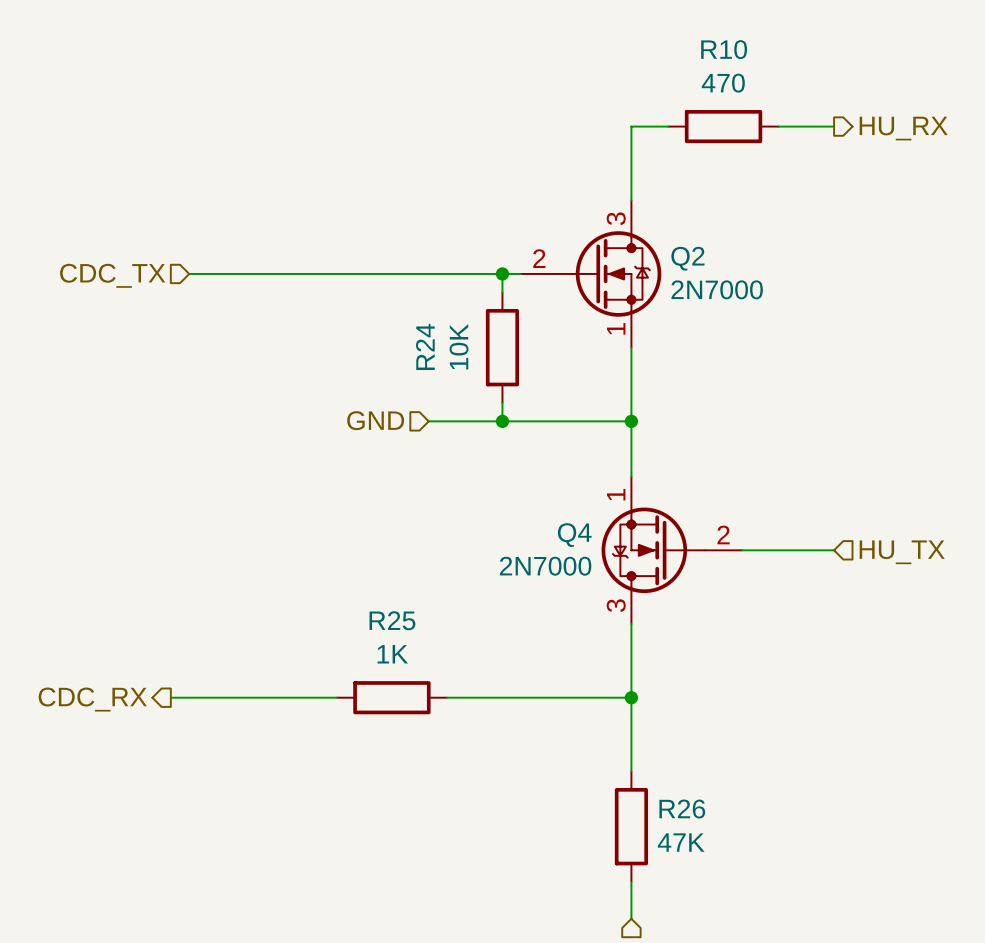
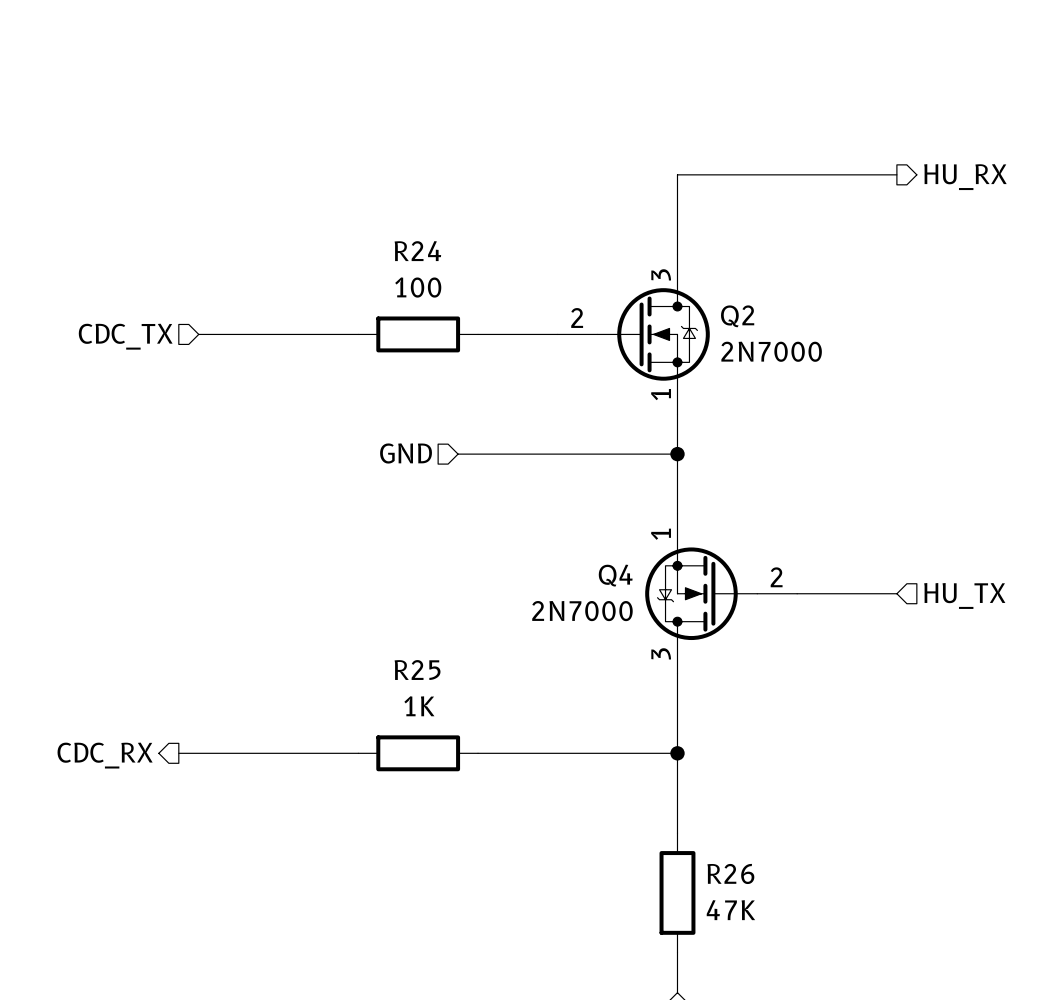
wire: (668, 126) (631, 126) (631, 163) -> (896, 174) (677, 174)
R10: 470 (723, 126) -> none
wire: (778, 126) (834, 126) -> none
hierarchical label position: HU_RX (903, 128) -> HU_RX (965, 177)
wire: (189, 273) (520, 273) -> none
wire: (502, 273) (502, 292) -> none
junction: (502, 273) -> none
Q2 position: (591, 273) -> (633, 334)
hierarchical label position: CDC_TX (112, 275) -> CDC_TX (125, 336)
wire: none -> (198, 334) (358, 334)
wire: none -> (478, 334) (557, 334)
R24 value: 10K (459, 346) -> 100 (418, 287)
R24 rotation: 0° (502, 347) -> 90° clockwise (418, 334)
R24 position: (502, 347) -> (418, 334)
wire: (502, 402) (502, 421) -> none
junction: (502, 421) -> none

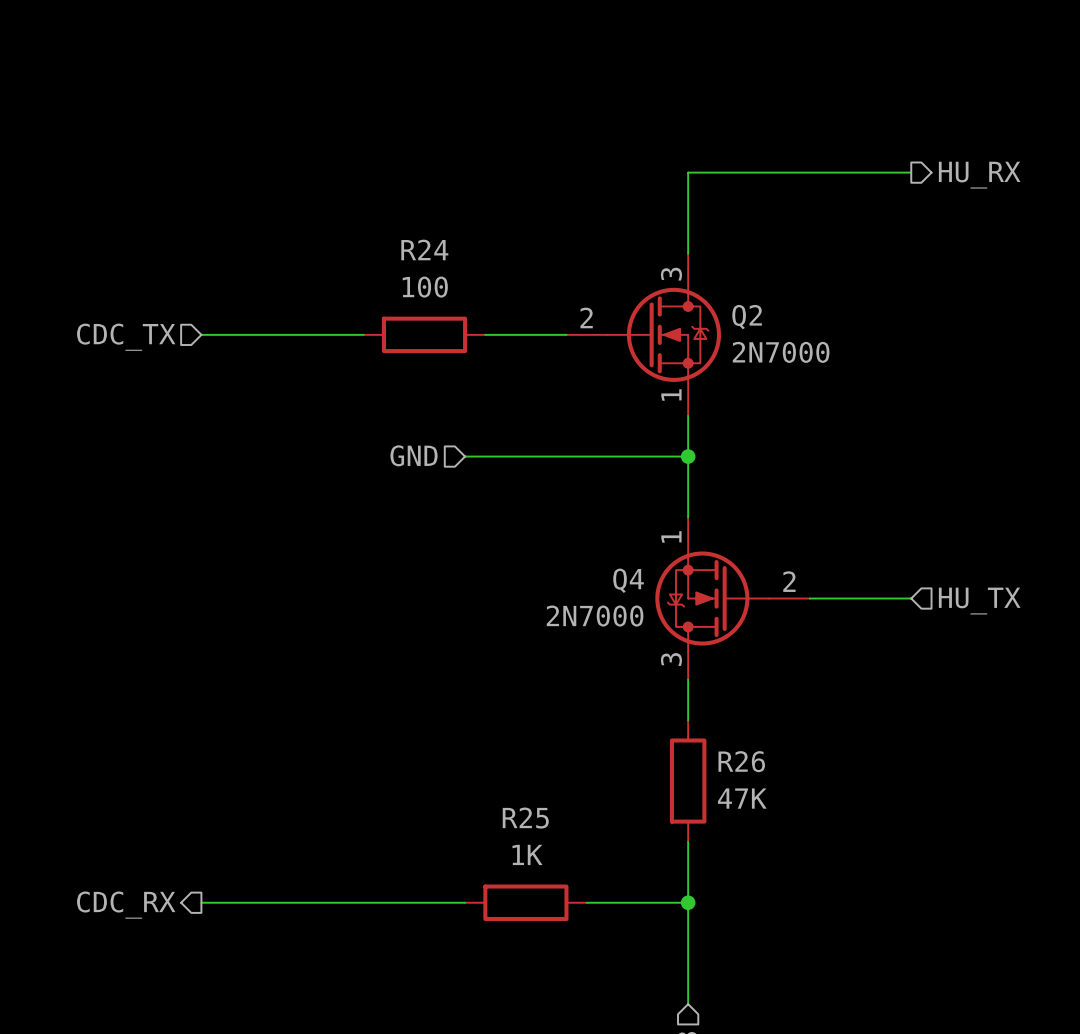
wire: (677, 713) (677, 833) -> (688, 963) (688, 841)
wire: (178, 753) (358, 753) -> none
R25 position: (418, 753) -> (525, 902)
wire: (478, 753) (677, 753) -> none
junction: (677, 753) -> none
hierarchical label position: CDC_RX (105, 755) -> CDC_RX (126, 905)
wire: none -> (201, 902) (465, 902)
wire: none -> (586, 902) (688, 902)
R26 position: (677, 892) -> (688, 781)
junction: none -> (688, 902)

